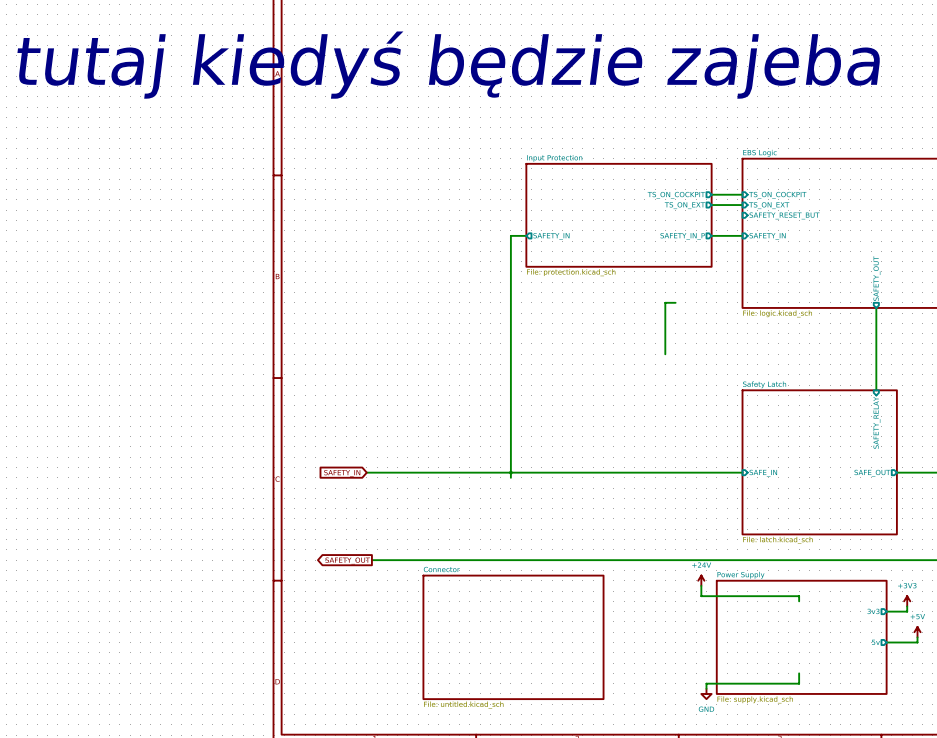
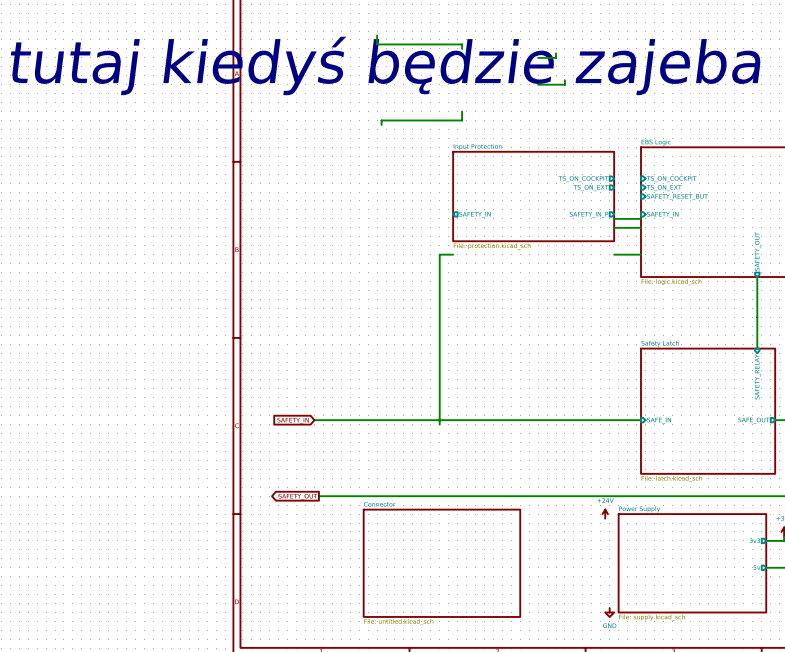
wire: none -> (377, 35) (377, 44) (462, 44) (462, 48)
wire: none -> (556, 53) (556, 57) (538, 57)
wire: none -> (564, 80) (564, 84) (538, 84)
wire: none -> (462, 111) (462, 120) (381, 120) (381, 124)
wire: (711, 194) (742, 194) -> (614, 218) (641, 218)
wire: (711, 205) (742, 205) -> (614, 227) (641, 227)
wire: (526, 235) (510, 235) (510, 282) -> (453, 254) (439, 254)
wire: (711, 235) (742, 235) -> (614, 254) (641, 254)
wire: (675, 302) (665, 302) (665, 354) -> none
wire: (701, 585) (701, 596) (799, 596) (799, 601) -> none
wire: (799, 673) (799, 683) (706, 683) (706, 688) -> none

